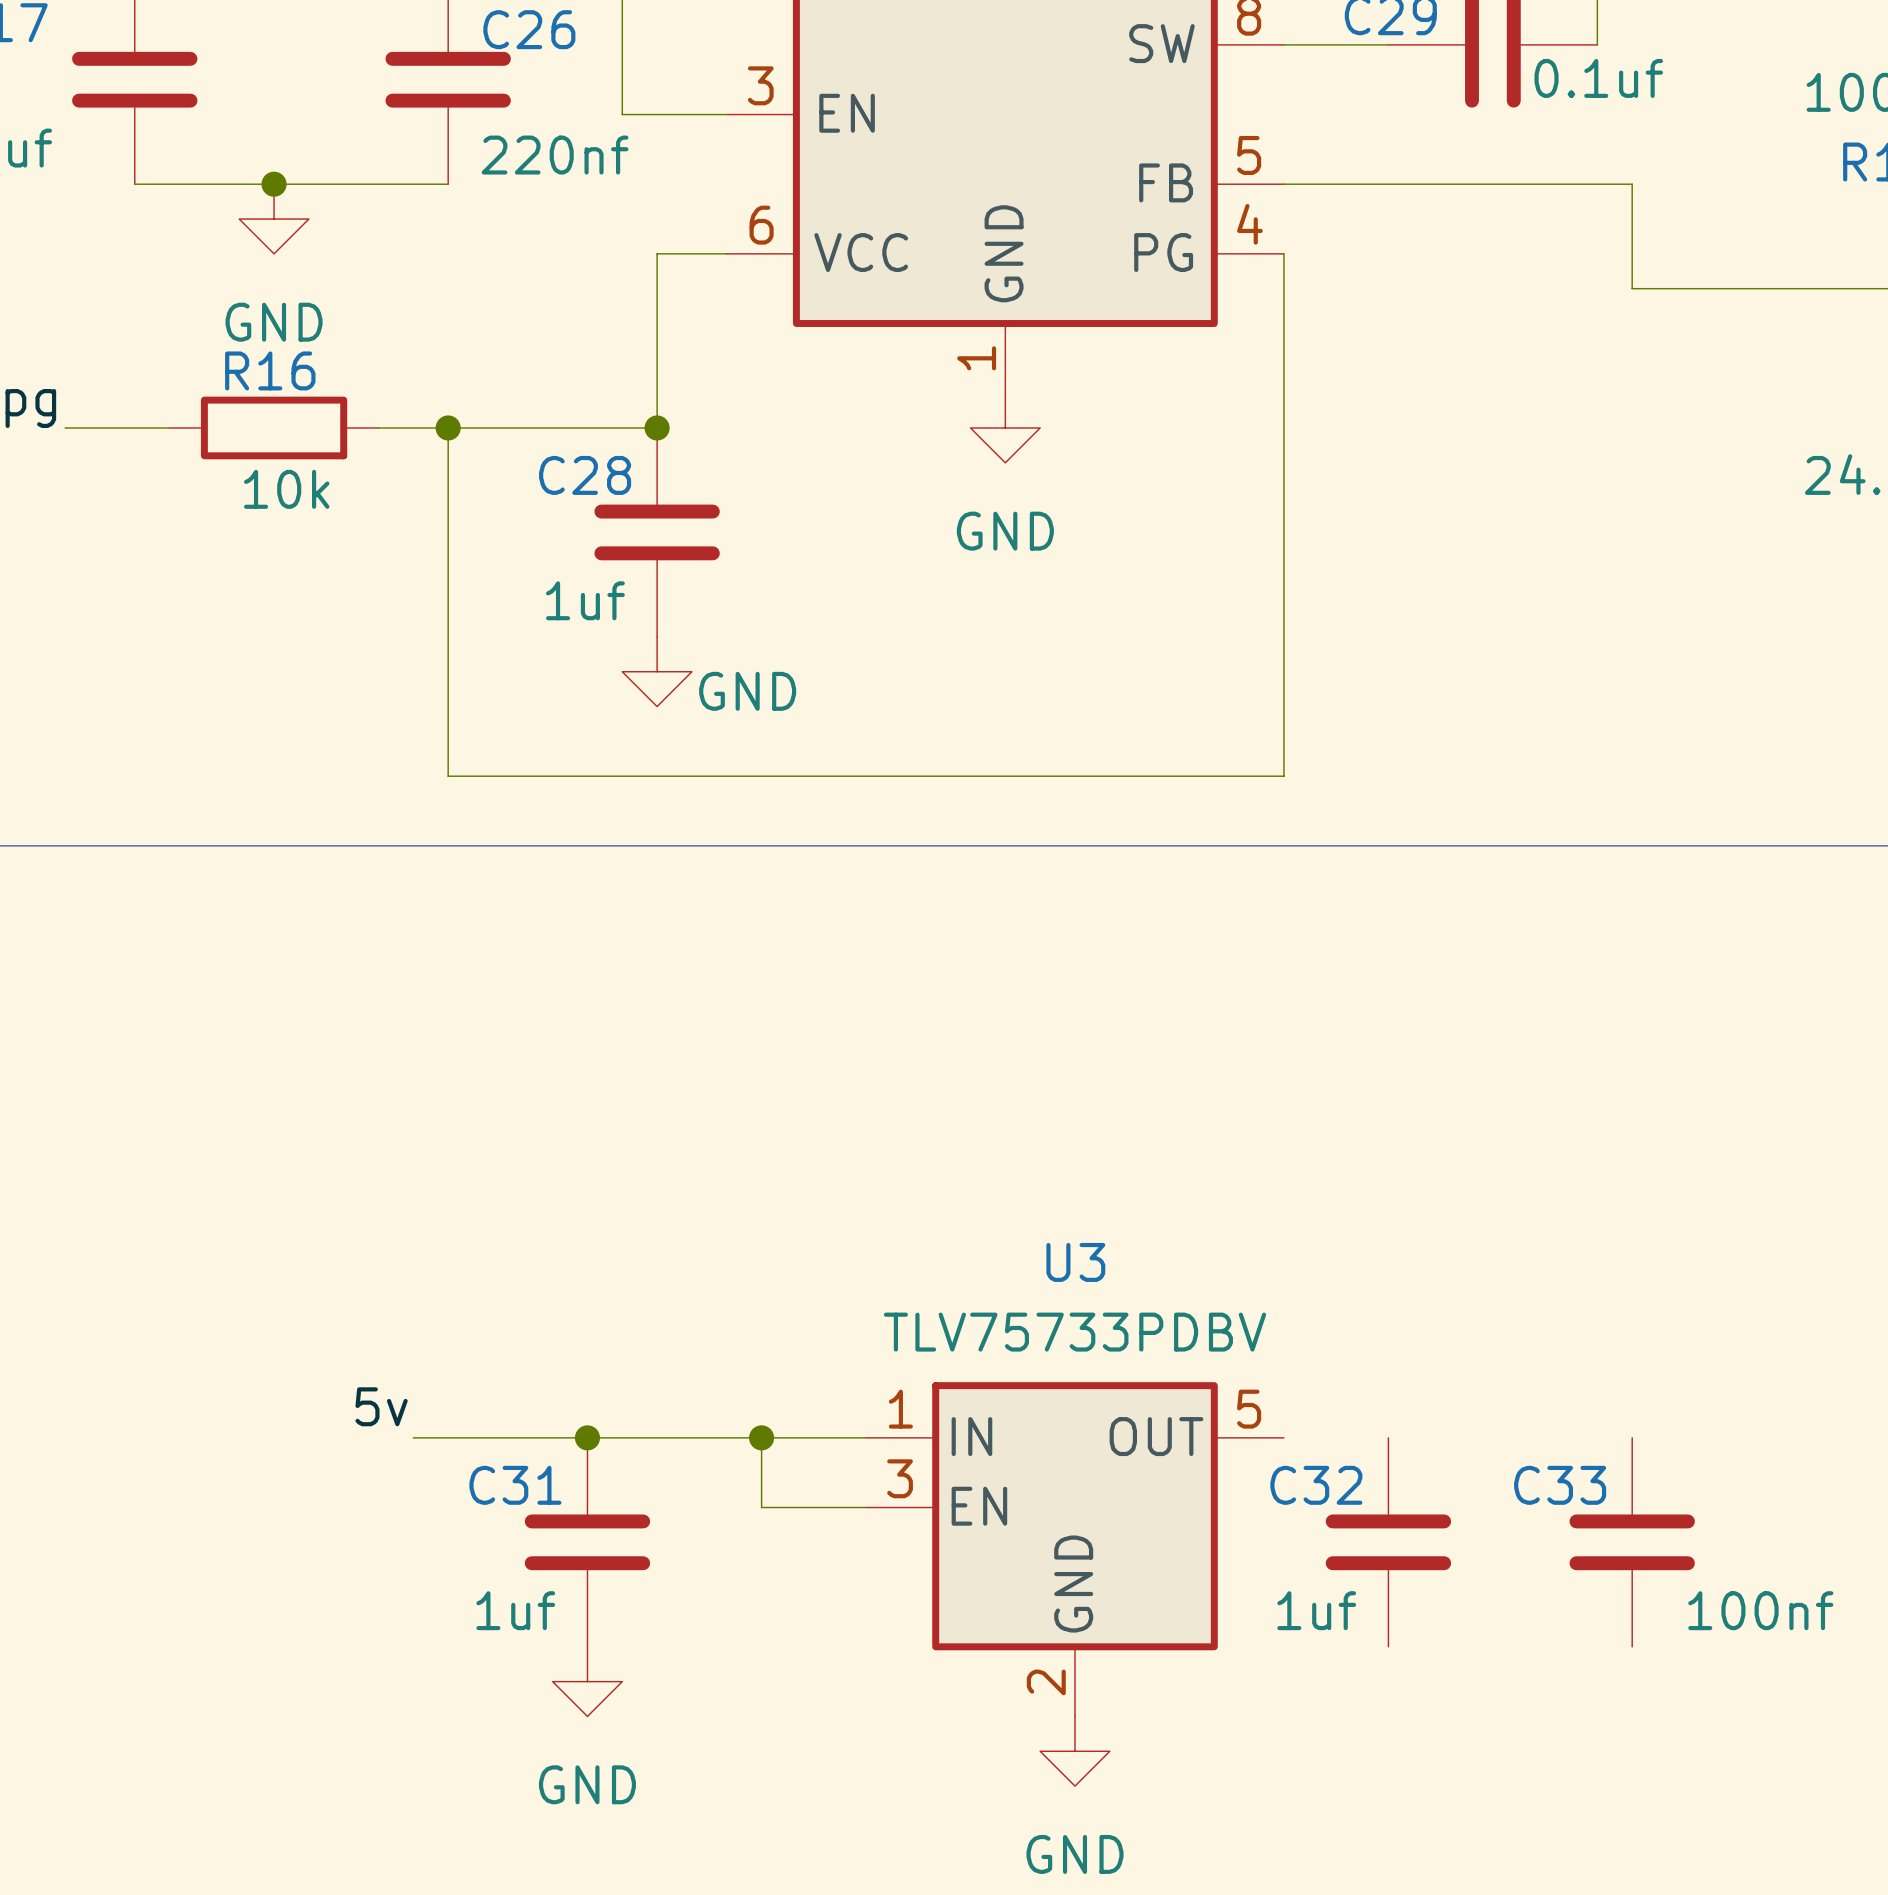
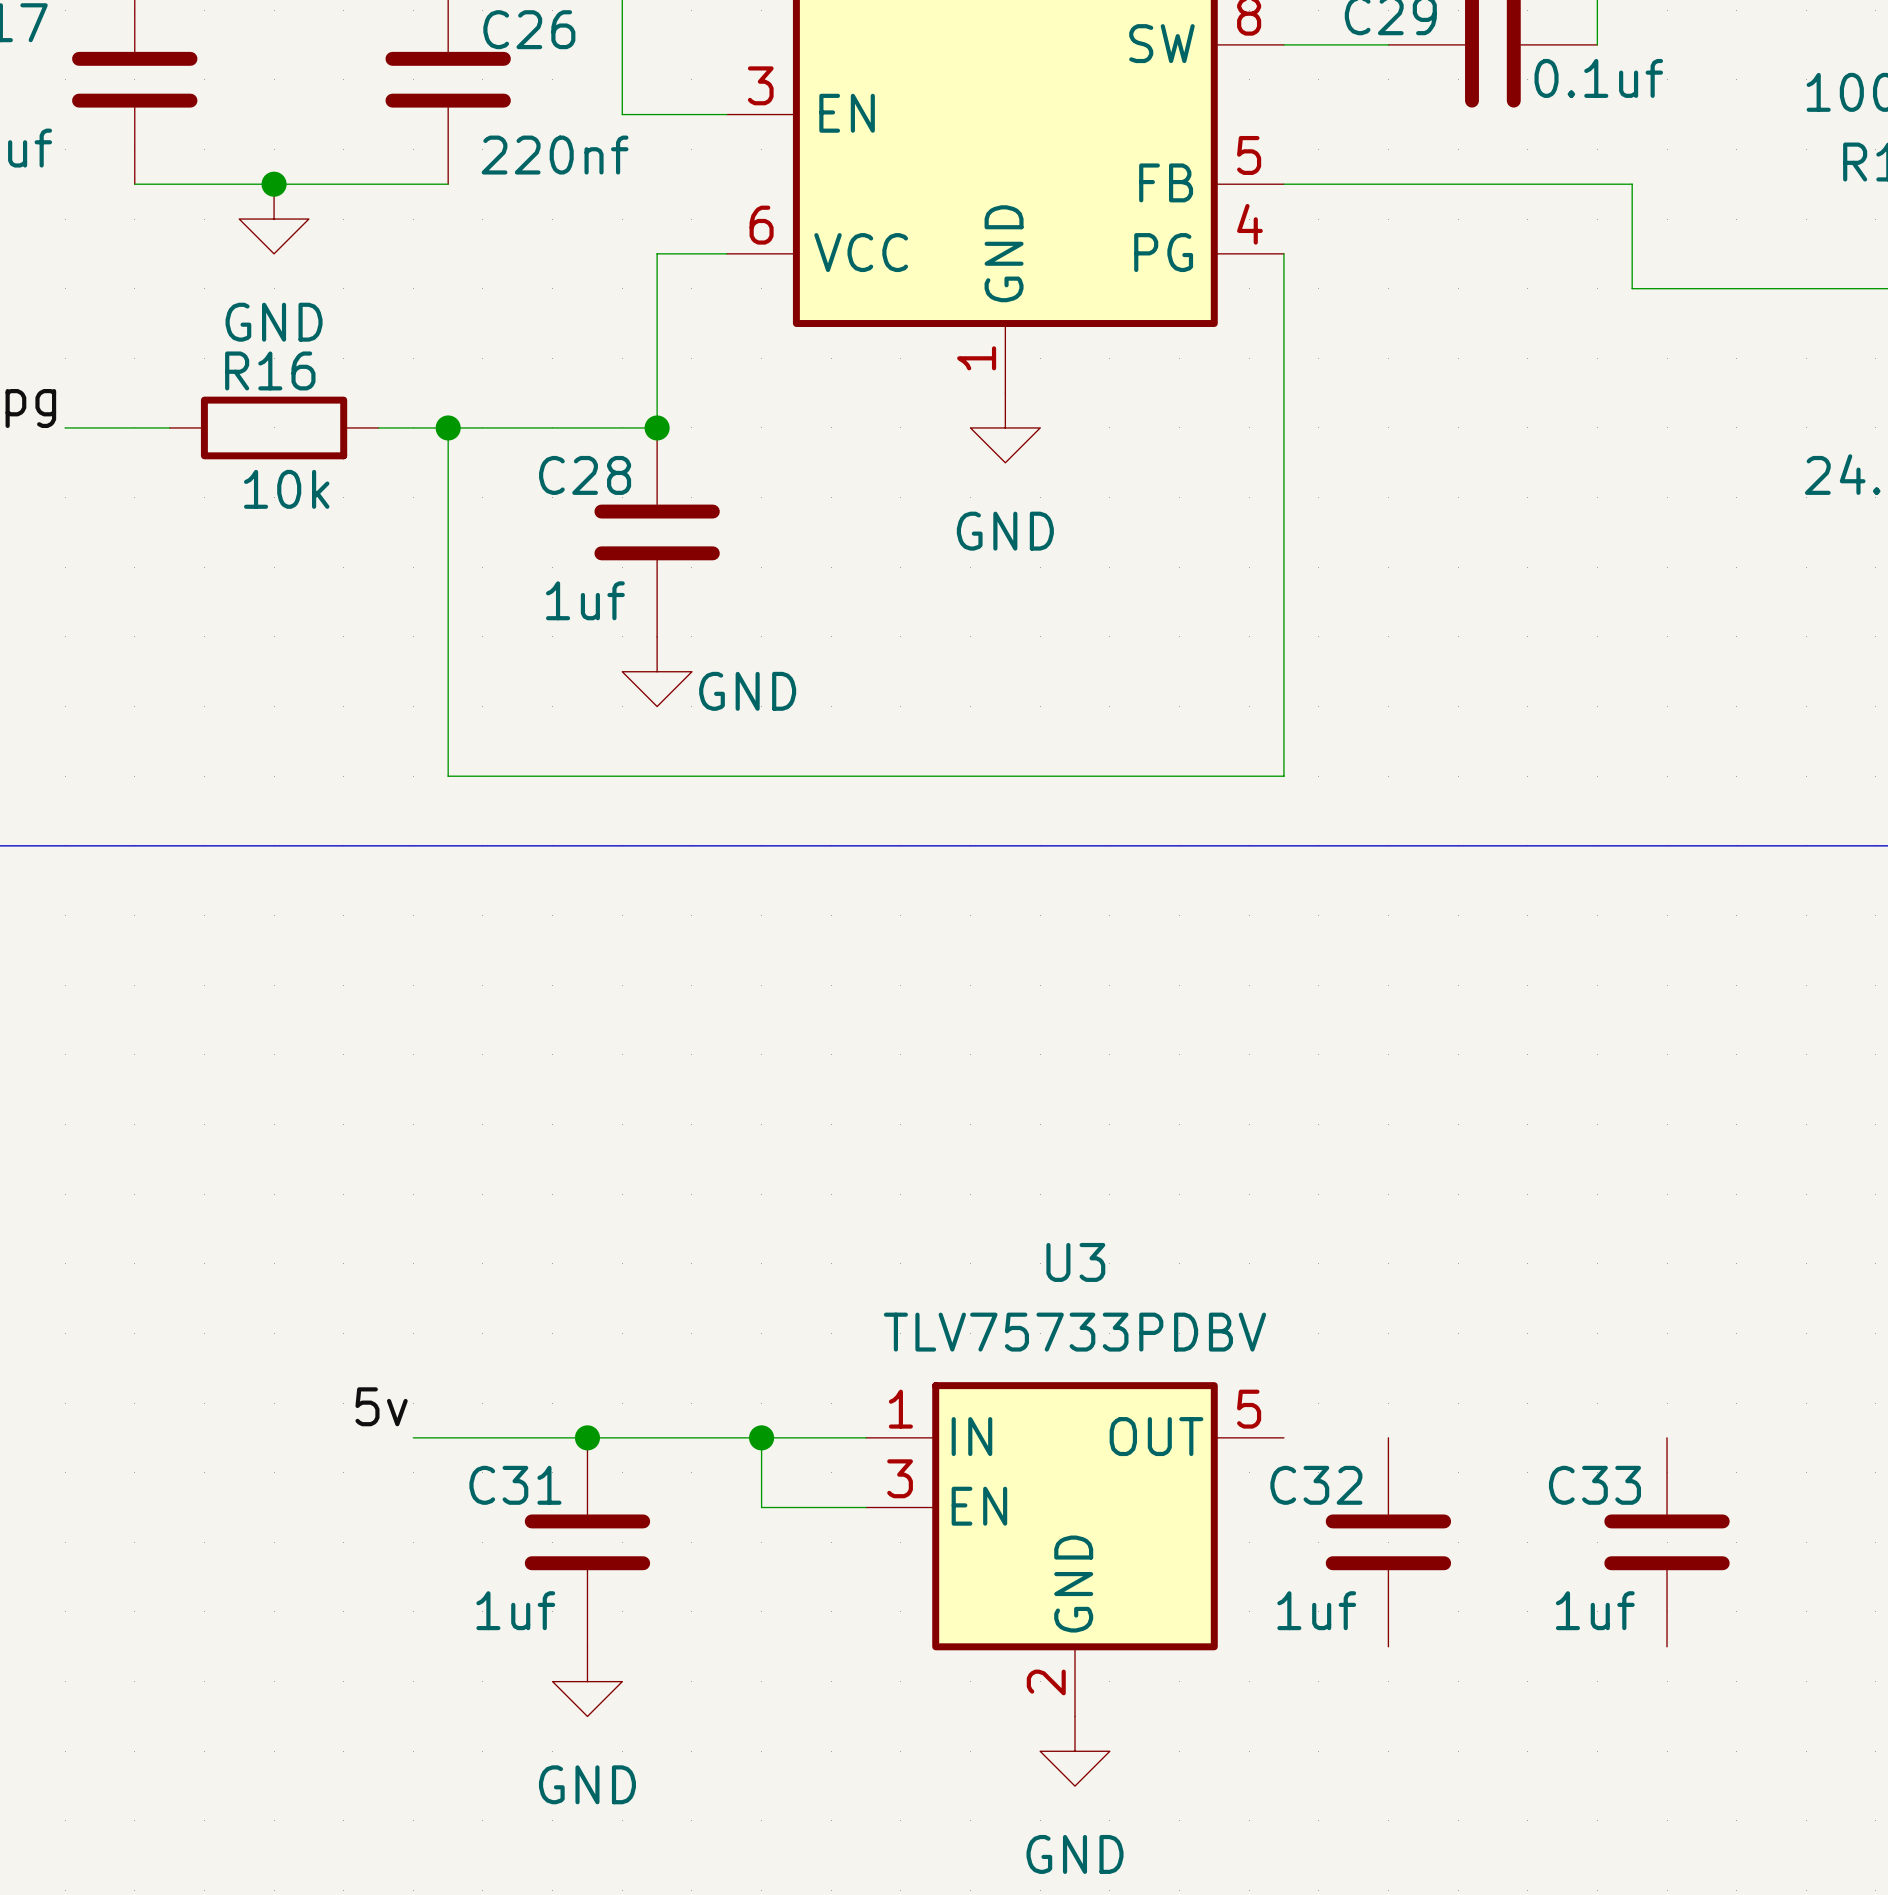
C33 position: (1632, 1542) -> (1667, 1542)
C33 value: 100nf (1760, 1610) -> 1uf (1595, 1610)

